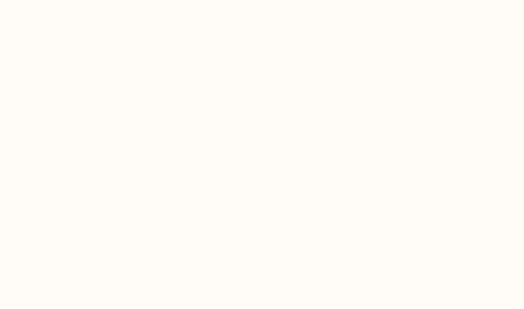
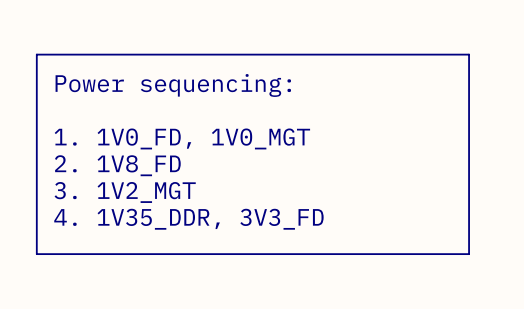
line: none -> (36, 54) (469, 54) (469, 254) (36, 254) (36, 54)
text: none -> Power sequencing: (173, 85)
text: none -> 1. 1V0_FD, 1V0_MGT (182, 138)
text: none -> 2. 1V8_FD (117, 165)
text: none -> 3. 1V2_MGT (125, 192)
text: none -> 4. 1V35_DDR, 3V3_FD (188, 219)

